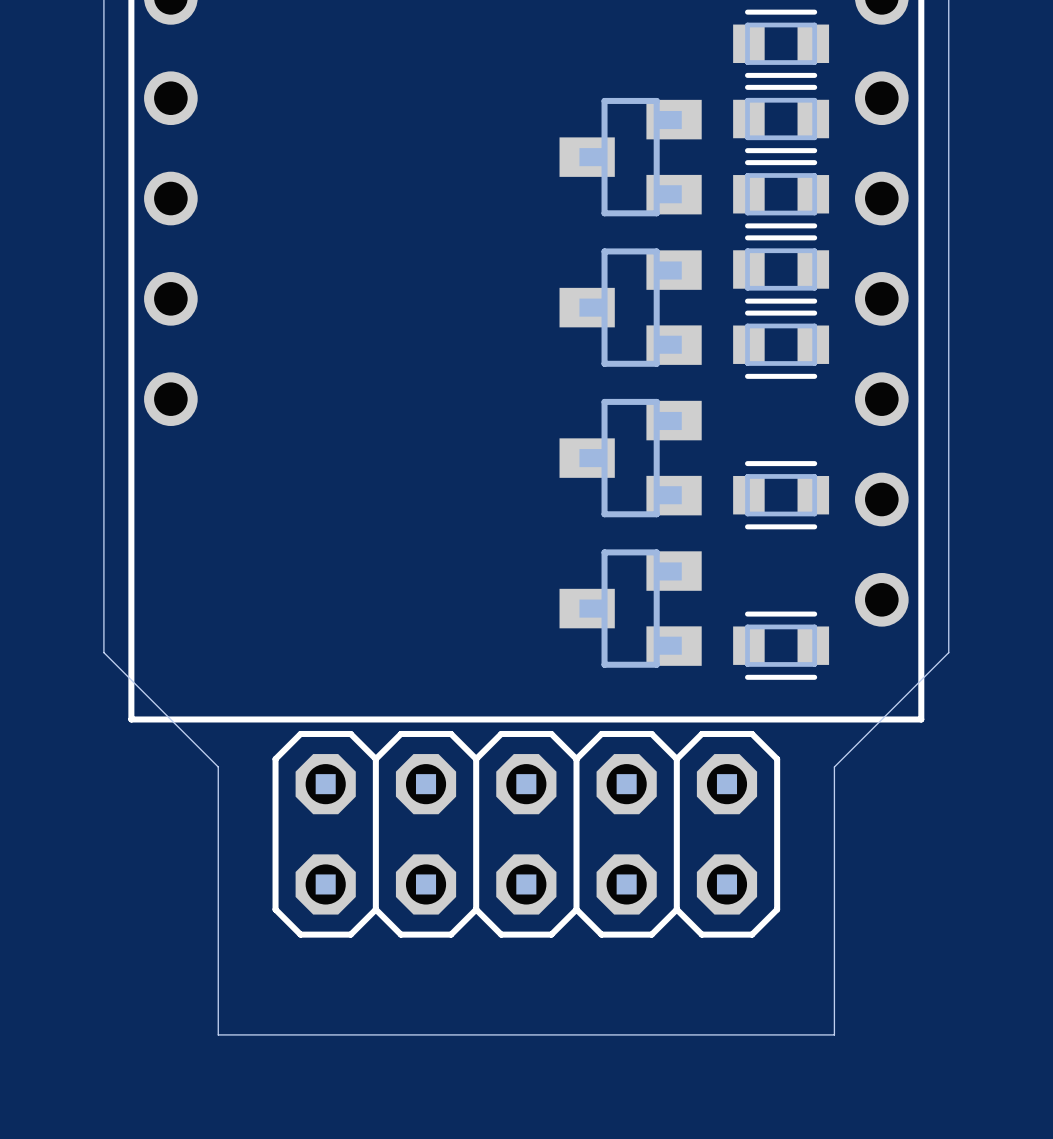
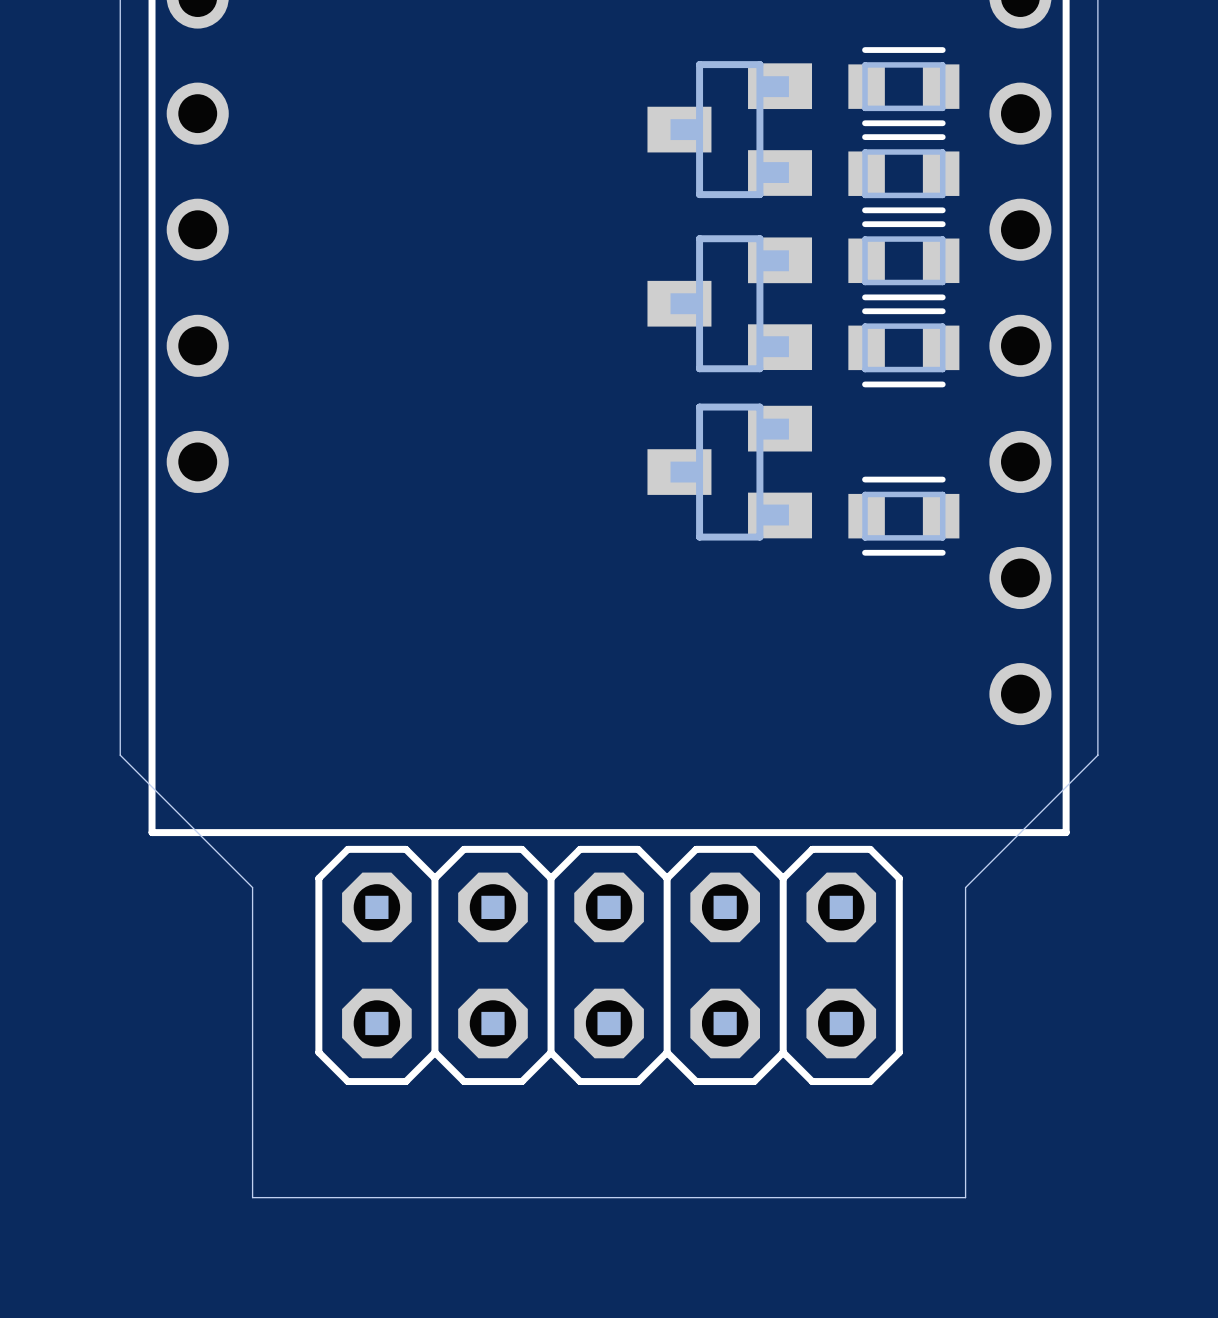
part: (781, 43) -> none
part: none -> (903, 86)
part: (781, 119) -> none
part: none -> (903, 173)
part position: (630, 157) -> (729, 129)
part: (781, 194) -> none
part: none -> (903, 260)
part: (781, 269) -> none
part: none -> (903, 347)
part position: (630, 307) -> (729, 303)
part: (781, 344) -> none
part: none -> (729, 472)
part: (630, 458) -> none
part position: (781, 495) -> (903, 516)
part: (630, 608) -> none
part: (781, 645) -> none

